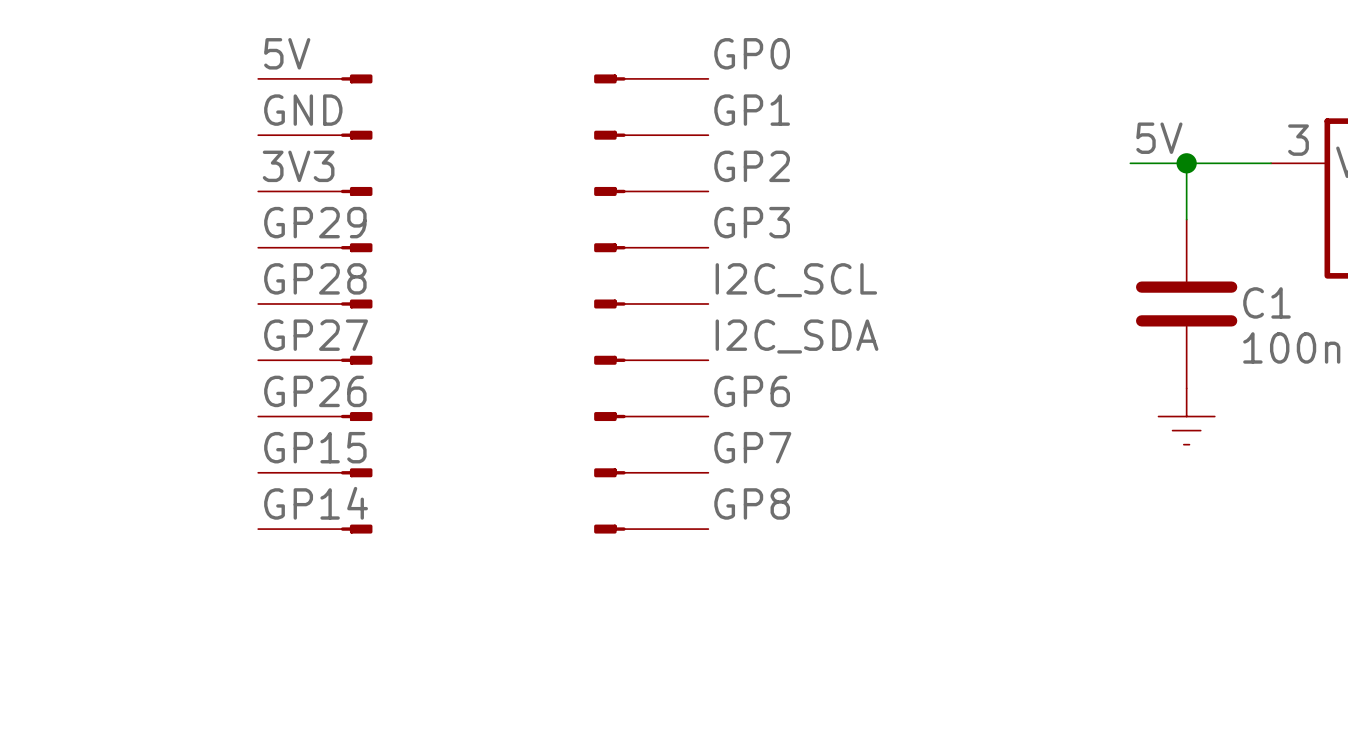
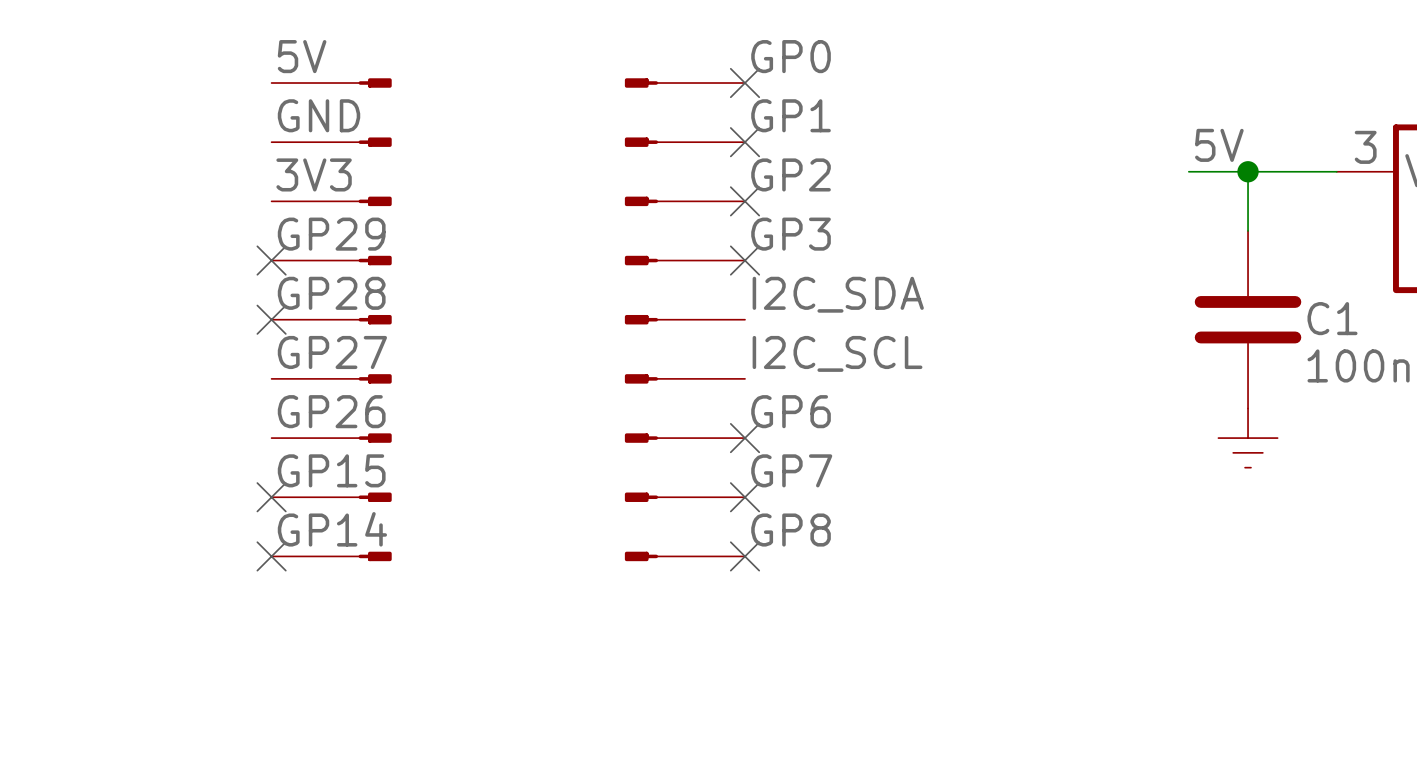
no-connect mark: none -> (745, 83)
no-connect mark: none -> (745, 142)
no-connect mark: none -> (745, 201)
no-connect mark: none -> (271, 260)
no-connect mark: none -> (745, 260)
label: I2C_SCL (796, 280) -> I2C_SDA (838, 294)
no-connect mark: none -> (271, 319)
label: I2C_SDA (797, 336) -> I2C_SCL (837, 353)
no-connect mark: none -> (745, 438)
no-connect mark: none -> (271, 497)
no-connect mark: none -> (745, 497)
no-connect mark: none -> (271, 556)
no-connect mark: none -> (745, 556)

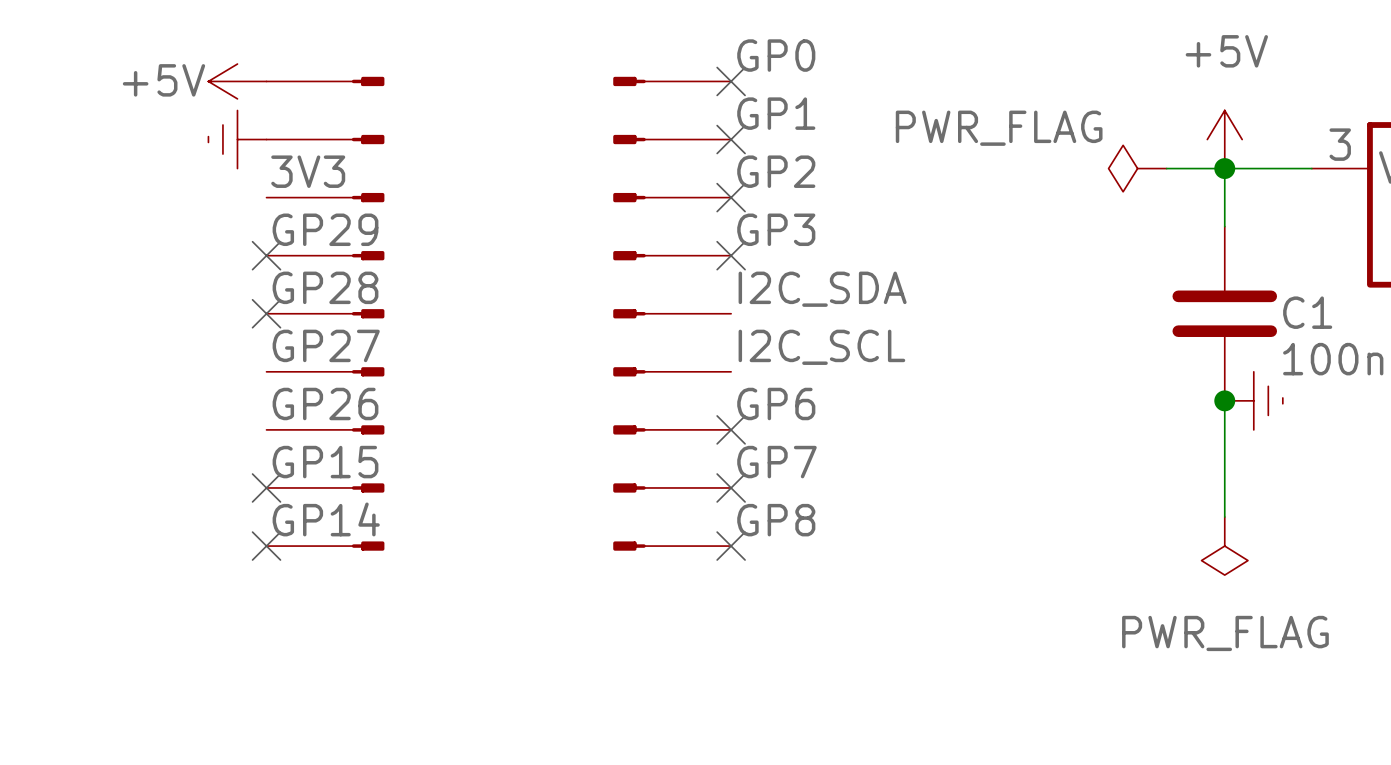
label: 5V (302, 56) -> none
power symbol: none -> +5V (237, 81)
label: GND (319, 115) -> none
power symbol: none -> (237, 139)
power symbol: none -> +5V (1224, 139)
label: 5V (1219, 145) -> none
power symbol: none -> PWR_FLAG (1137, 168)
wire: none -> (1224, 400) (1224, 517)
junction: none -> (1224, 400)
power symbol rotation: 0° (1248, 438) -> 90° counterclockwise (1253, 400)
power symbol position: (1248, 438) -> (1253, 400)
power symbol: none -> PWR_FLAG (1224, 546)

